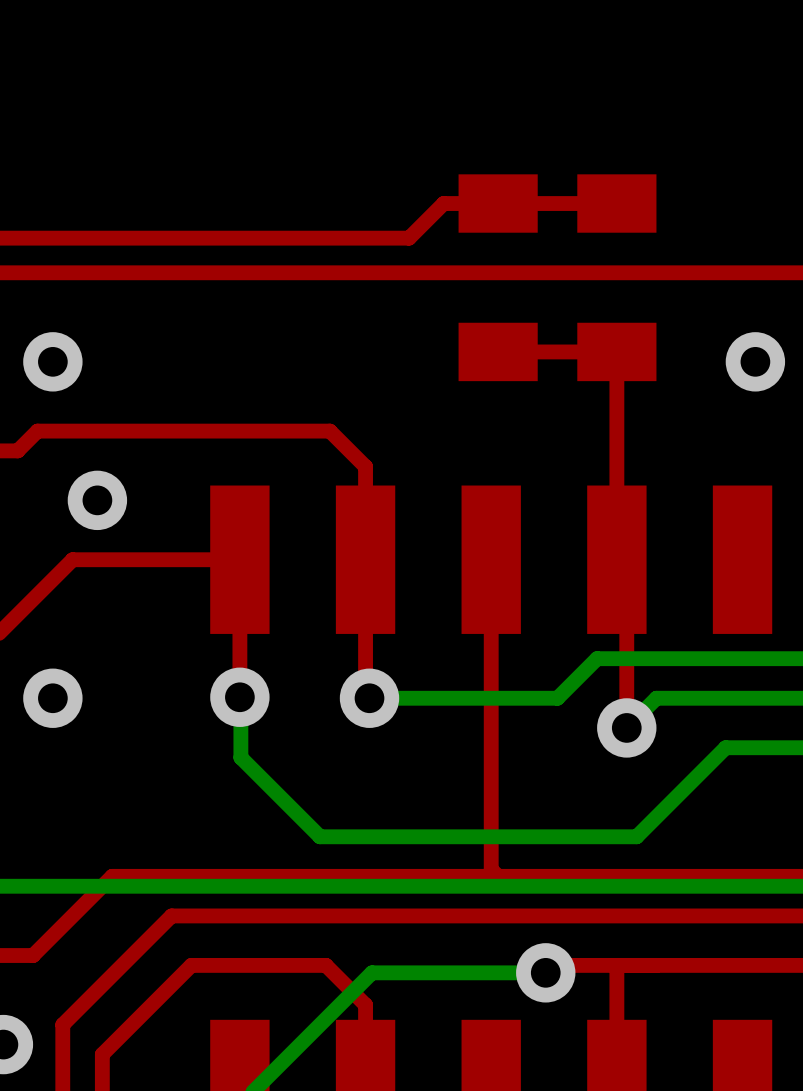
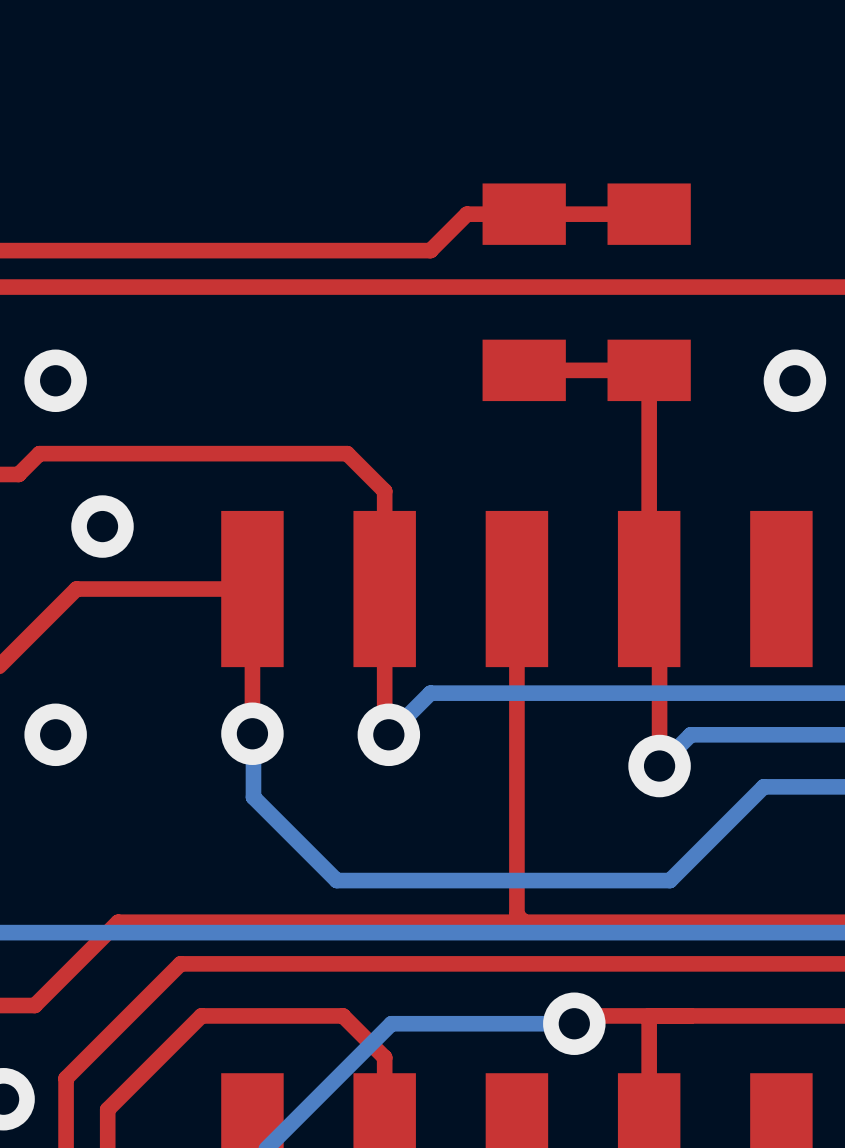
bottom track: (597, 658) (557, 698) (369, 698) -> (628, 693) (430, 693) (388, 734)

